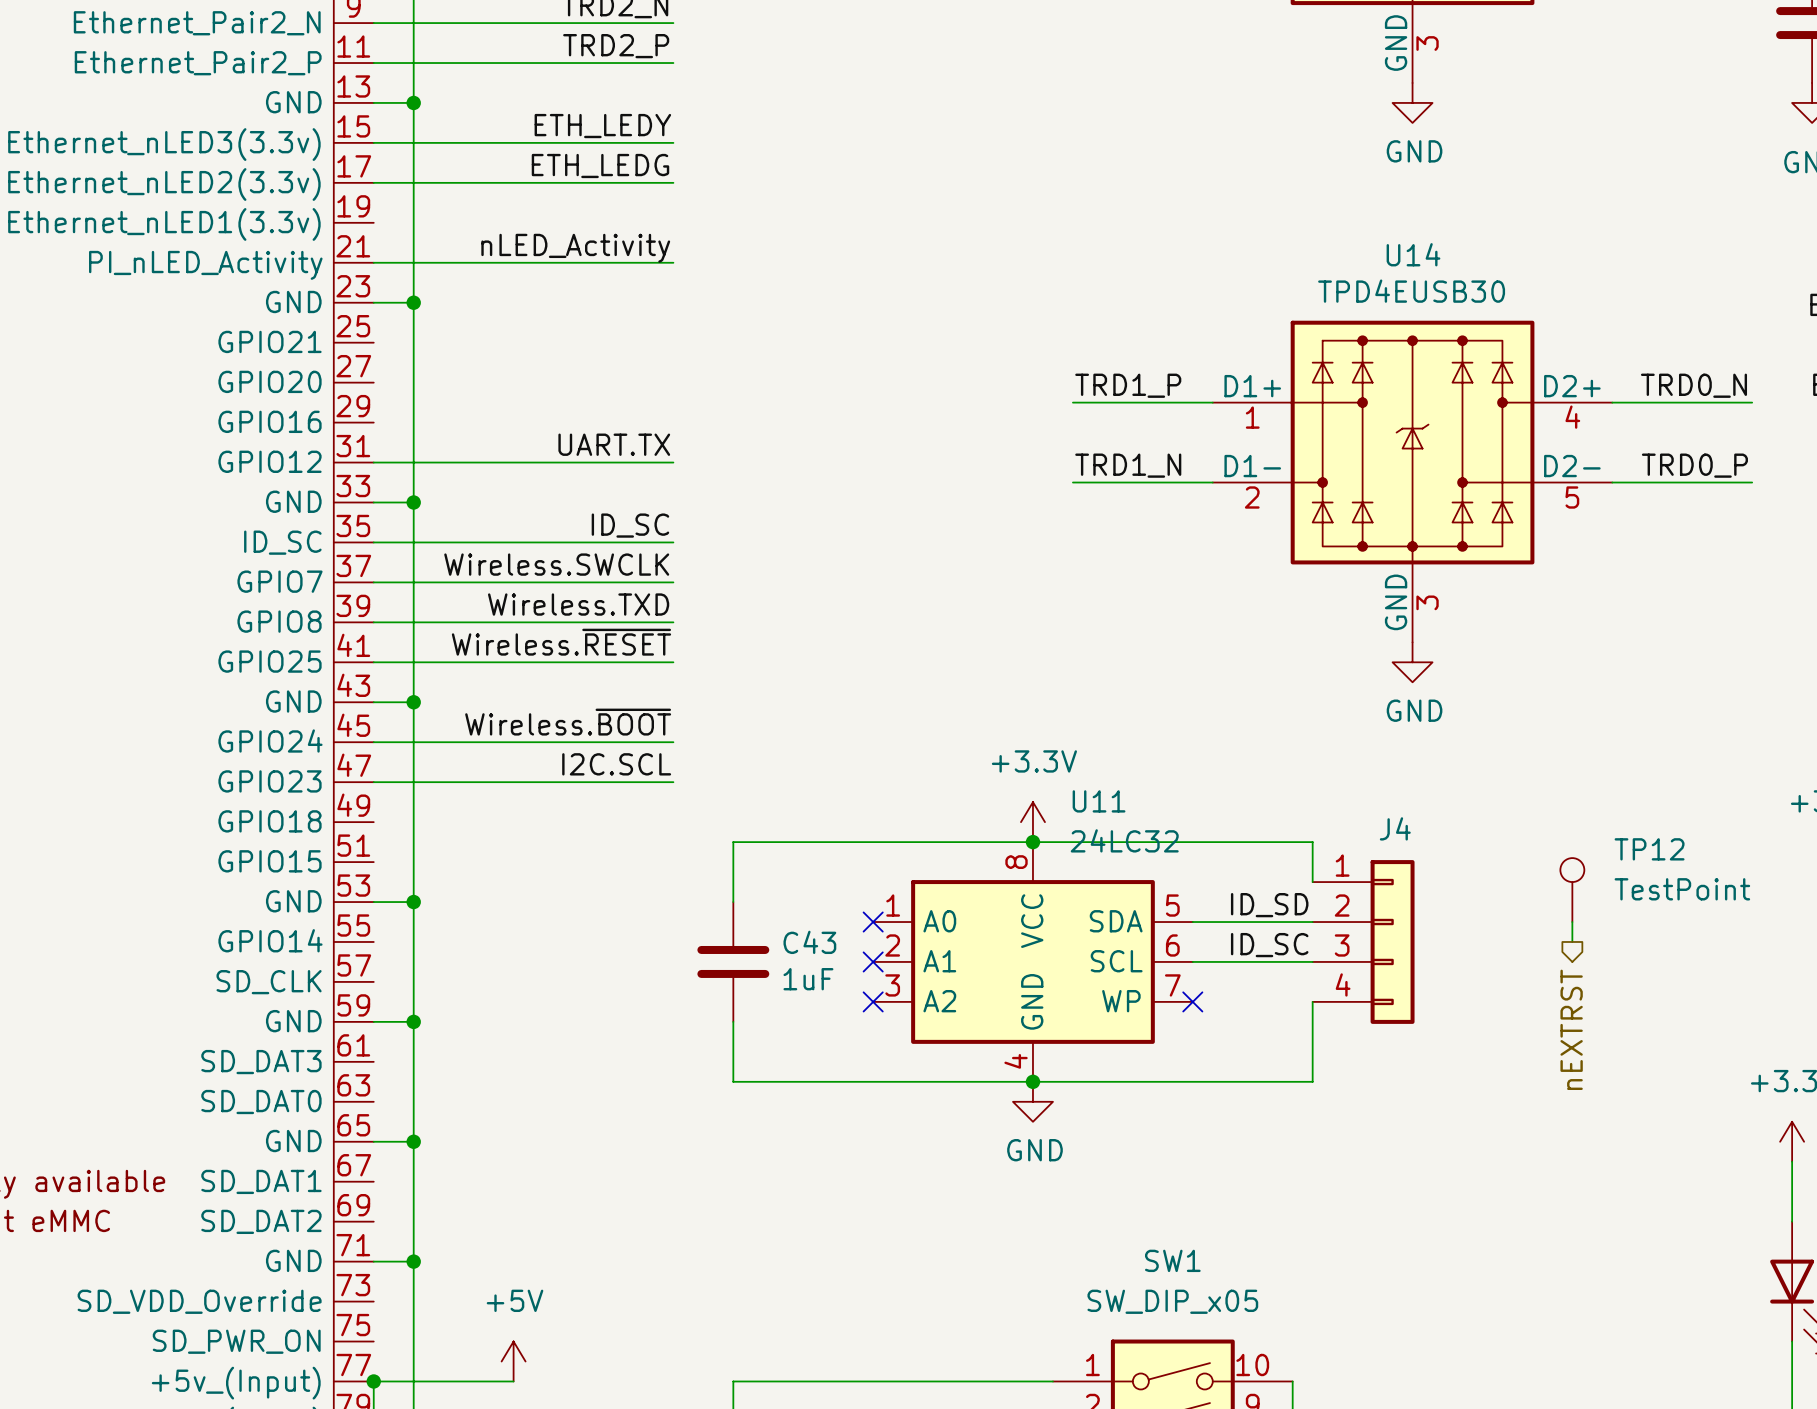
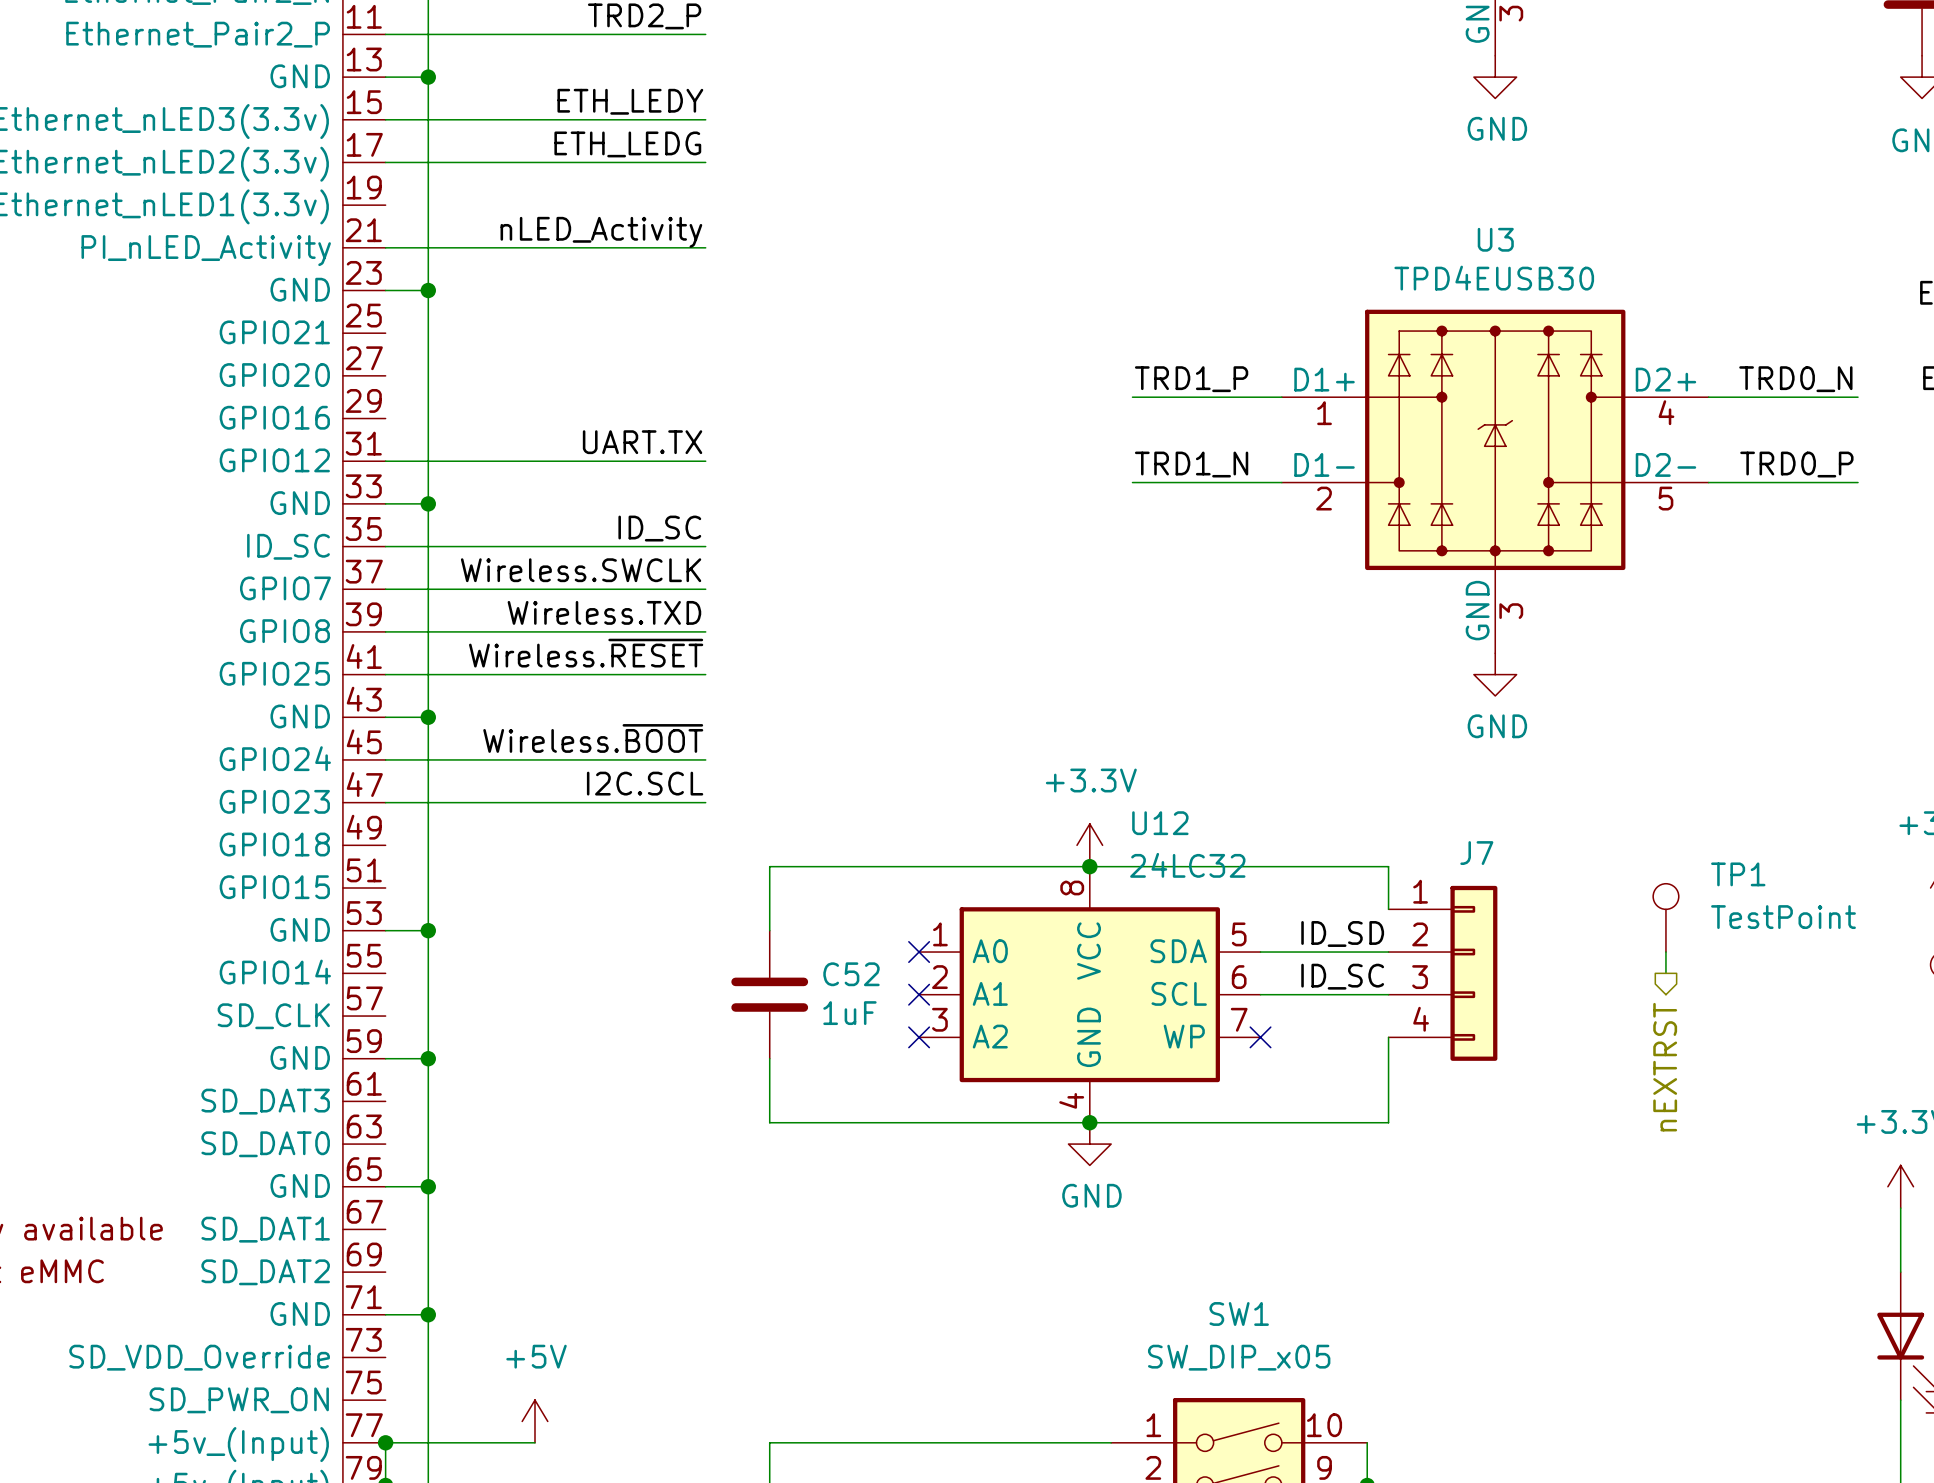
U14 name: U14 (1413, 254) -> U3 (1495, 239)
U11 name: U11 (1099, 801) -> U12 (1160, 823)
J4 name: J4 (1395, 828) -> J7 (1476, 853)
TP12 name: TP12 (1649, 849) -> TP1 (1738, 874)
C43 name: C43 (809, 942) -> C52 (851, 974)

